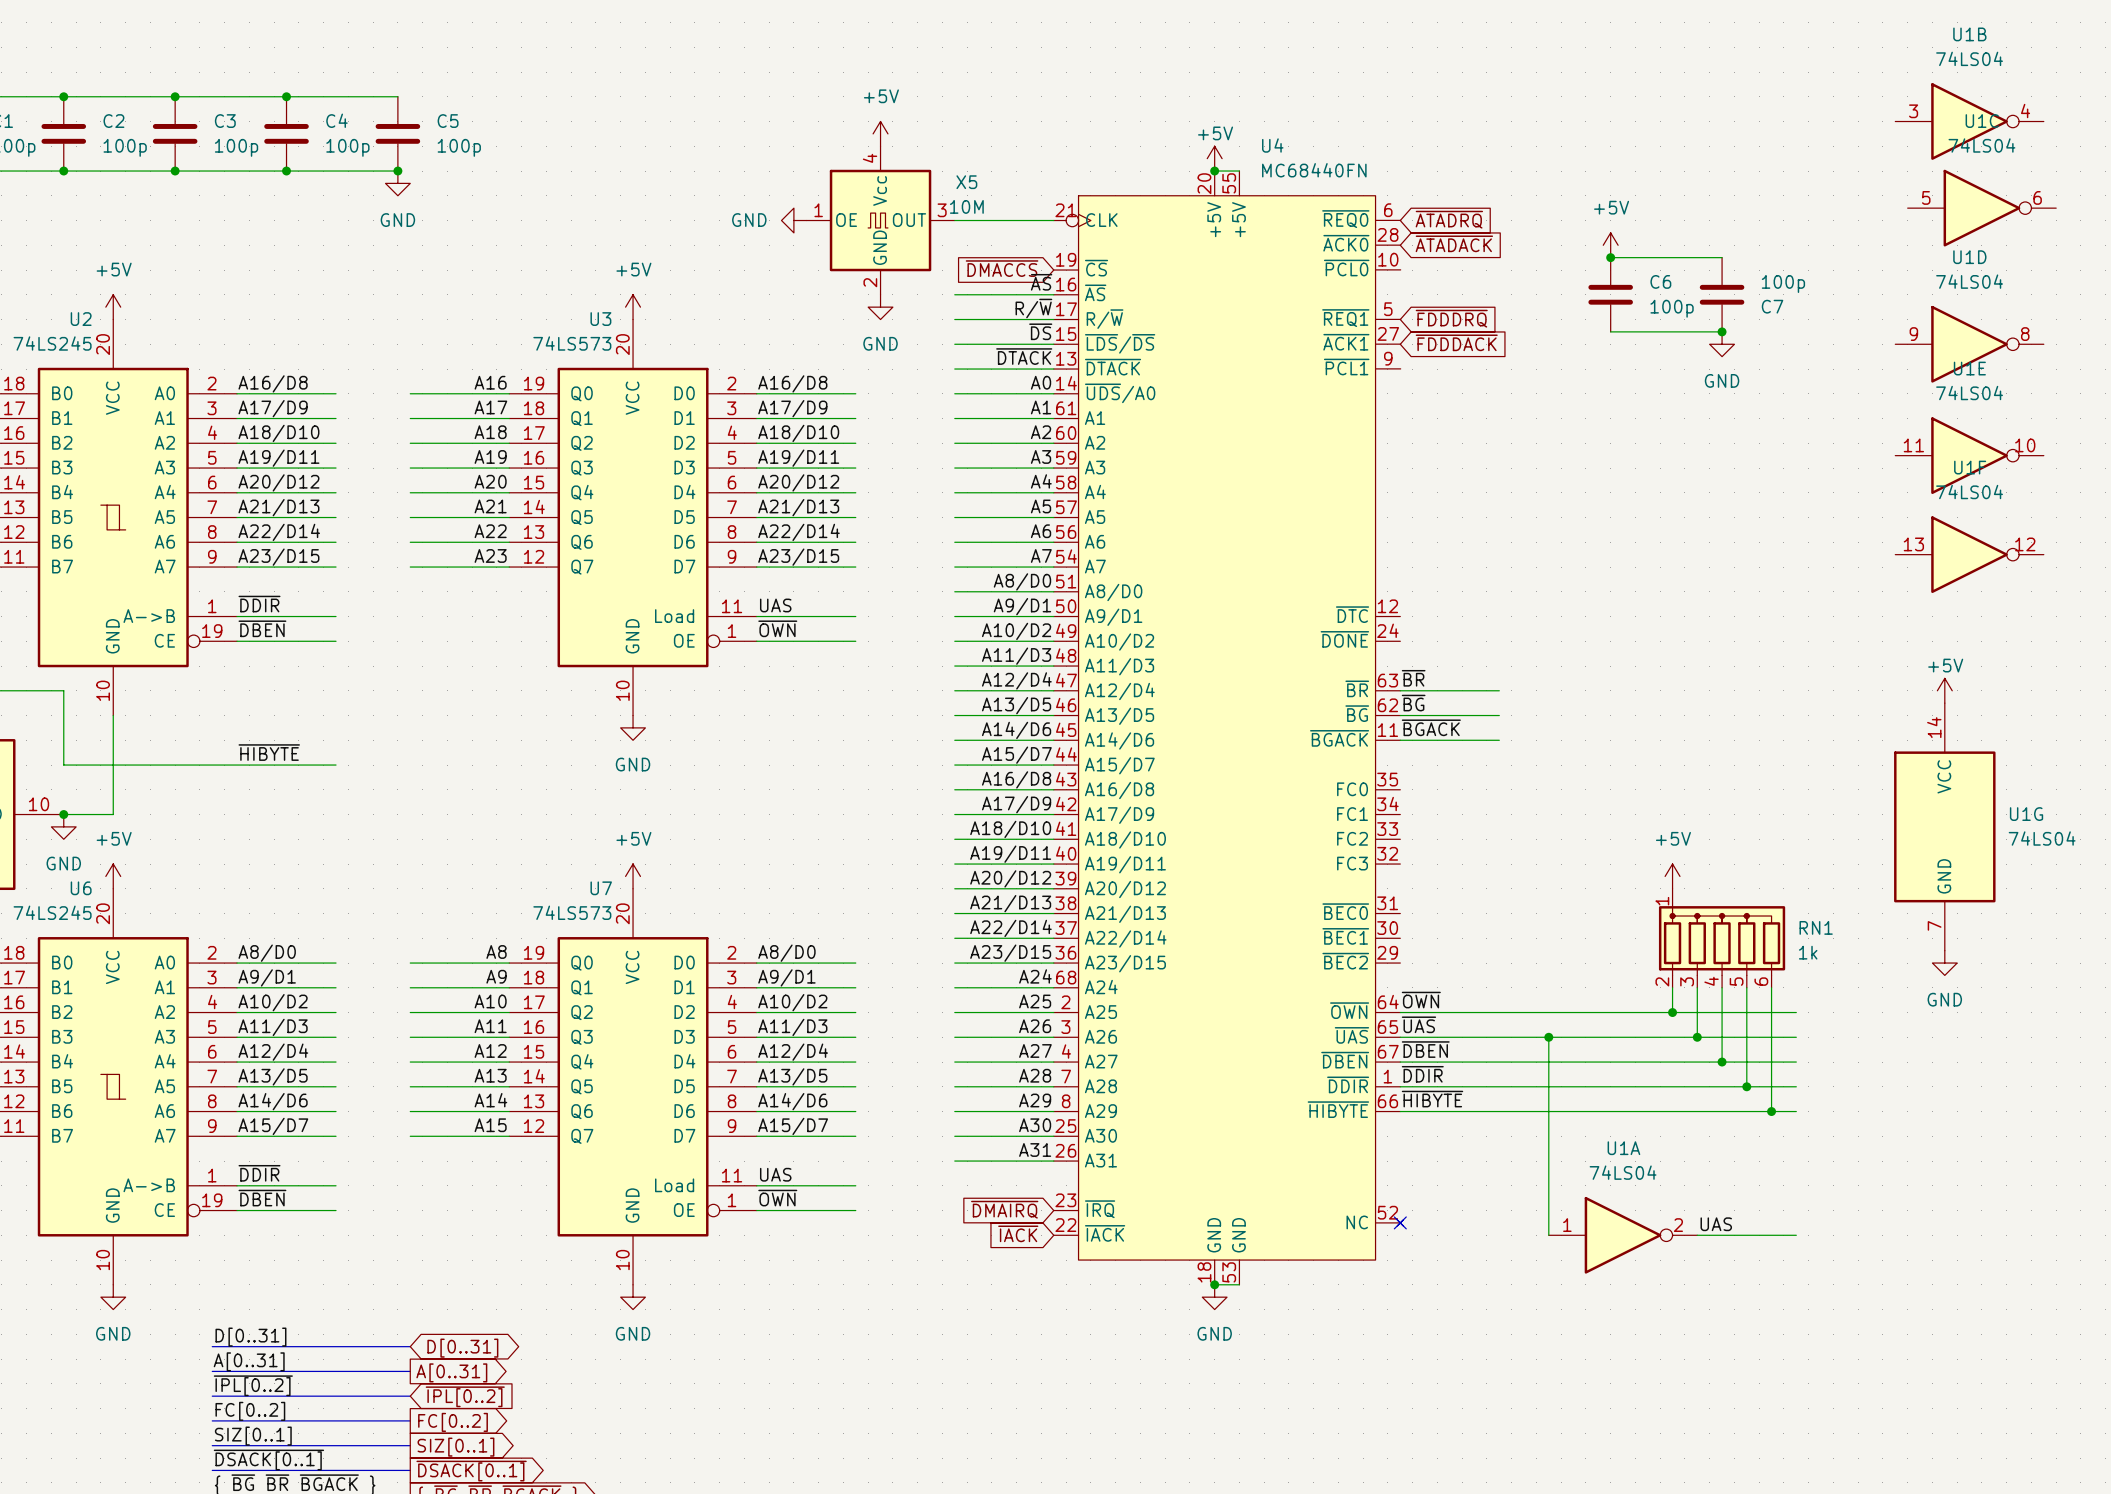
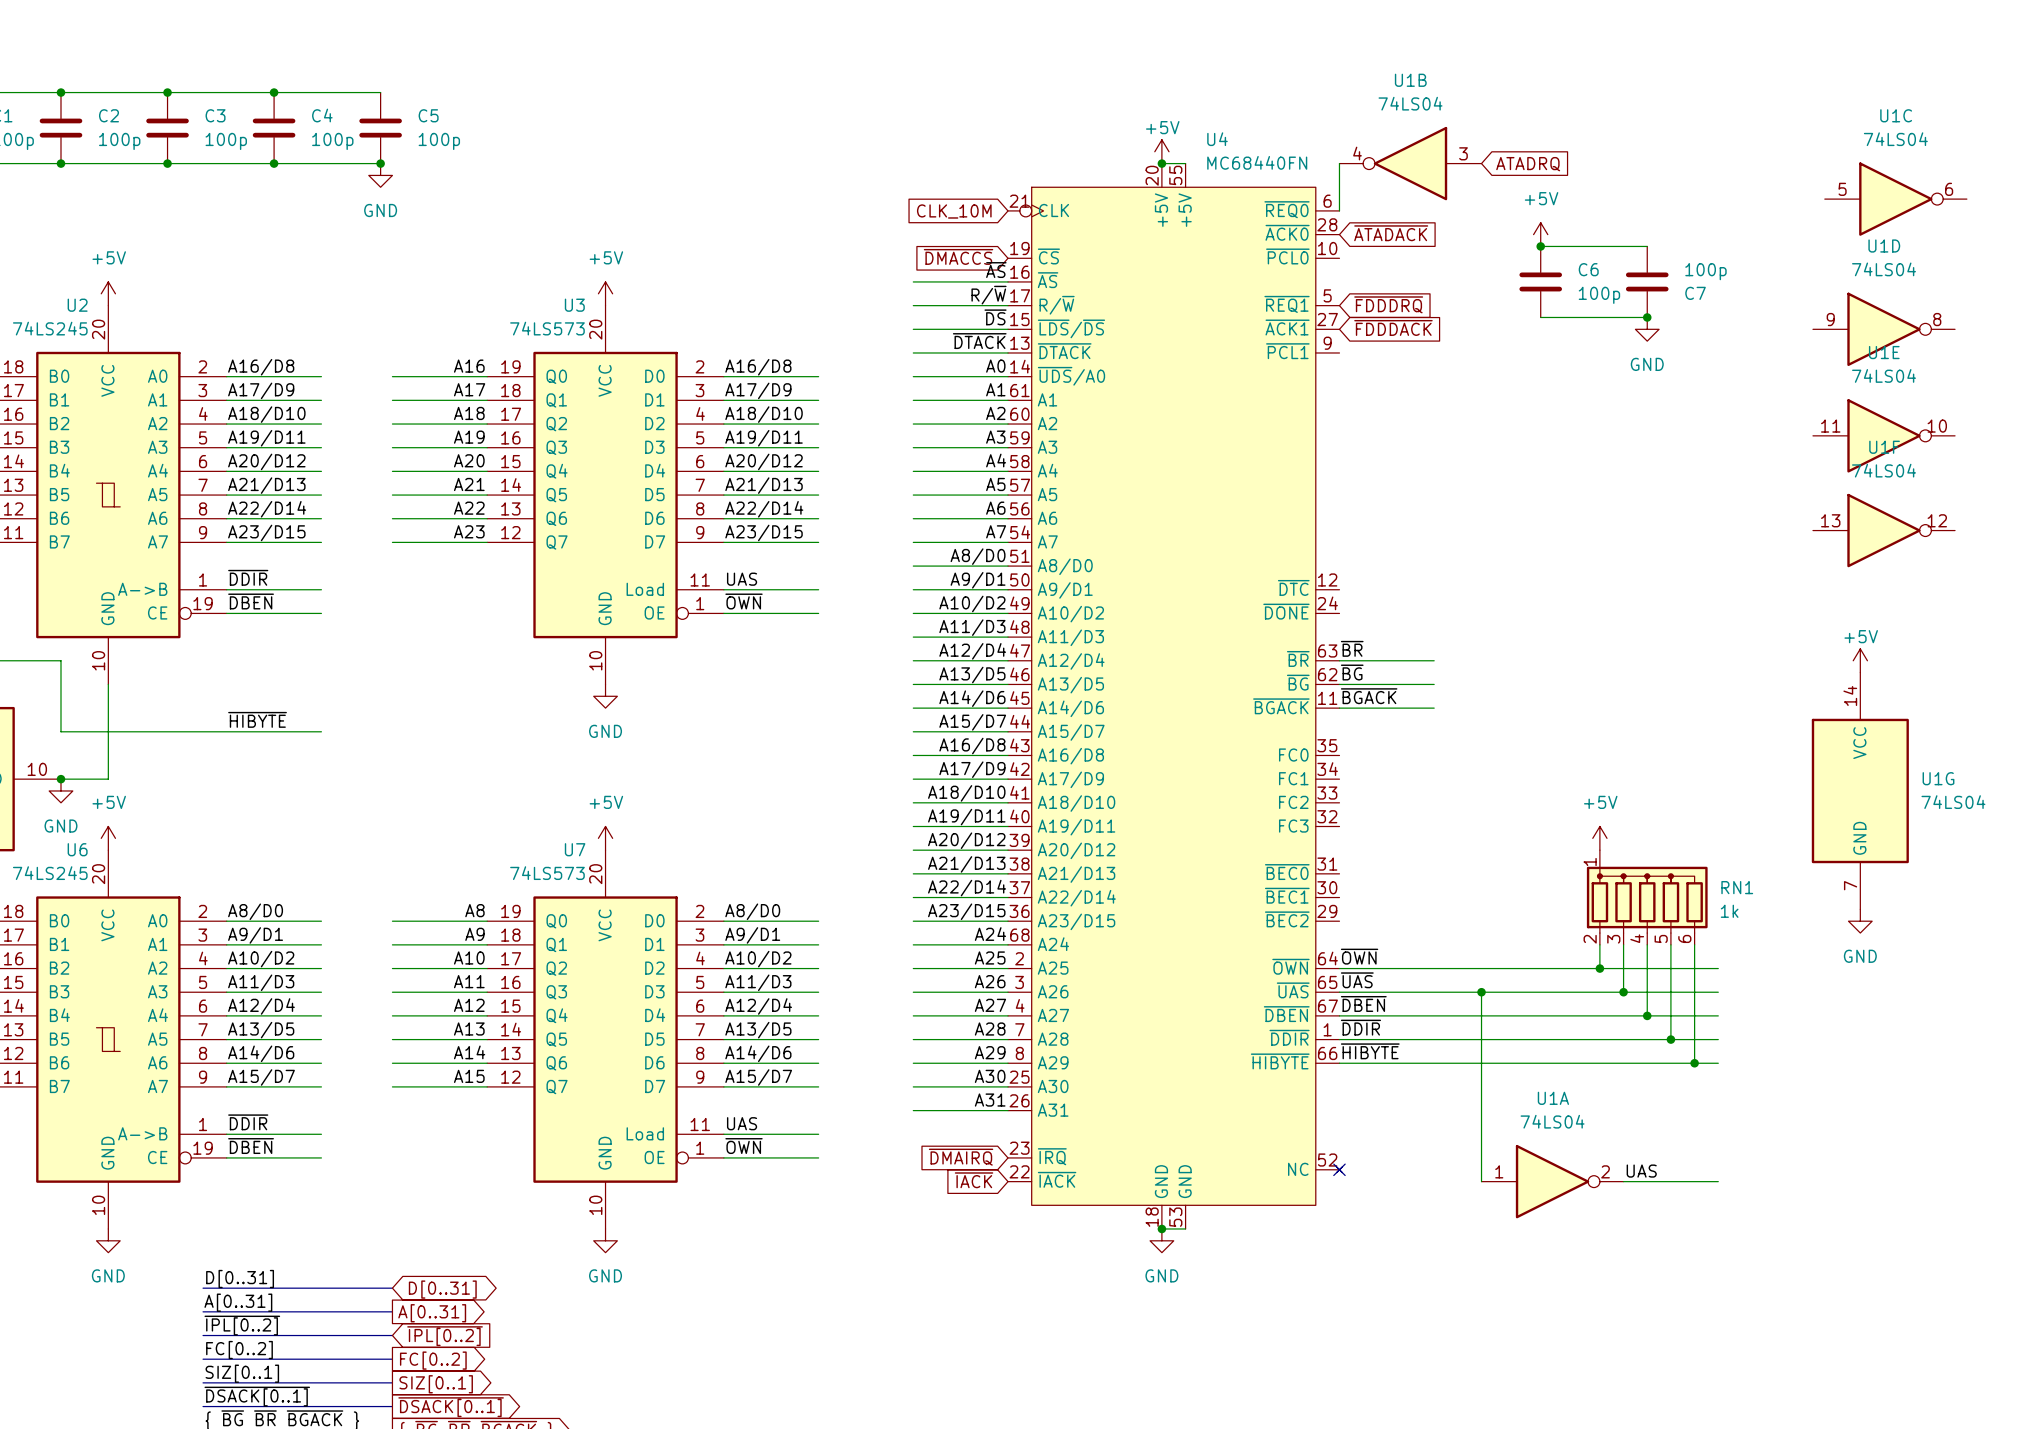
U1B rotation: 0° (1969, 121) -> 180° (1410, 163)
U1B position: (1969, 121) -> (1410, 163)
power symbol: +5V (880, 133) -> none
U4 symbol: [1053, 171, 1404, 1285] -> [1008, 163, 1343, 1229]
wire: none -> (1339, 163) (1339, 210)
global label: none -> ATADRQ (1528, 164)
global label: ~{ATADRQ} (1449, 219) -> none
power symbol: GND (793, 220) -> none
X5: 10M (880, 220) -> none
wire: (954, 220) (1053, 220) -> none
global label: none -> CLK_10M (954, 211)
power symbol: GND (880, 307) -> none

